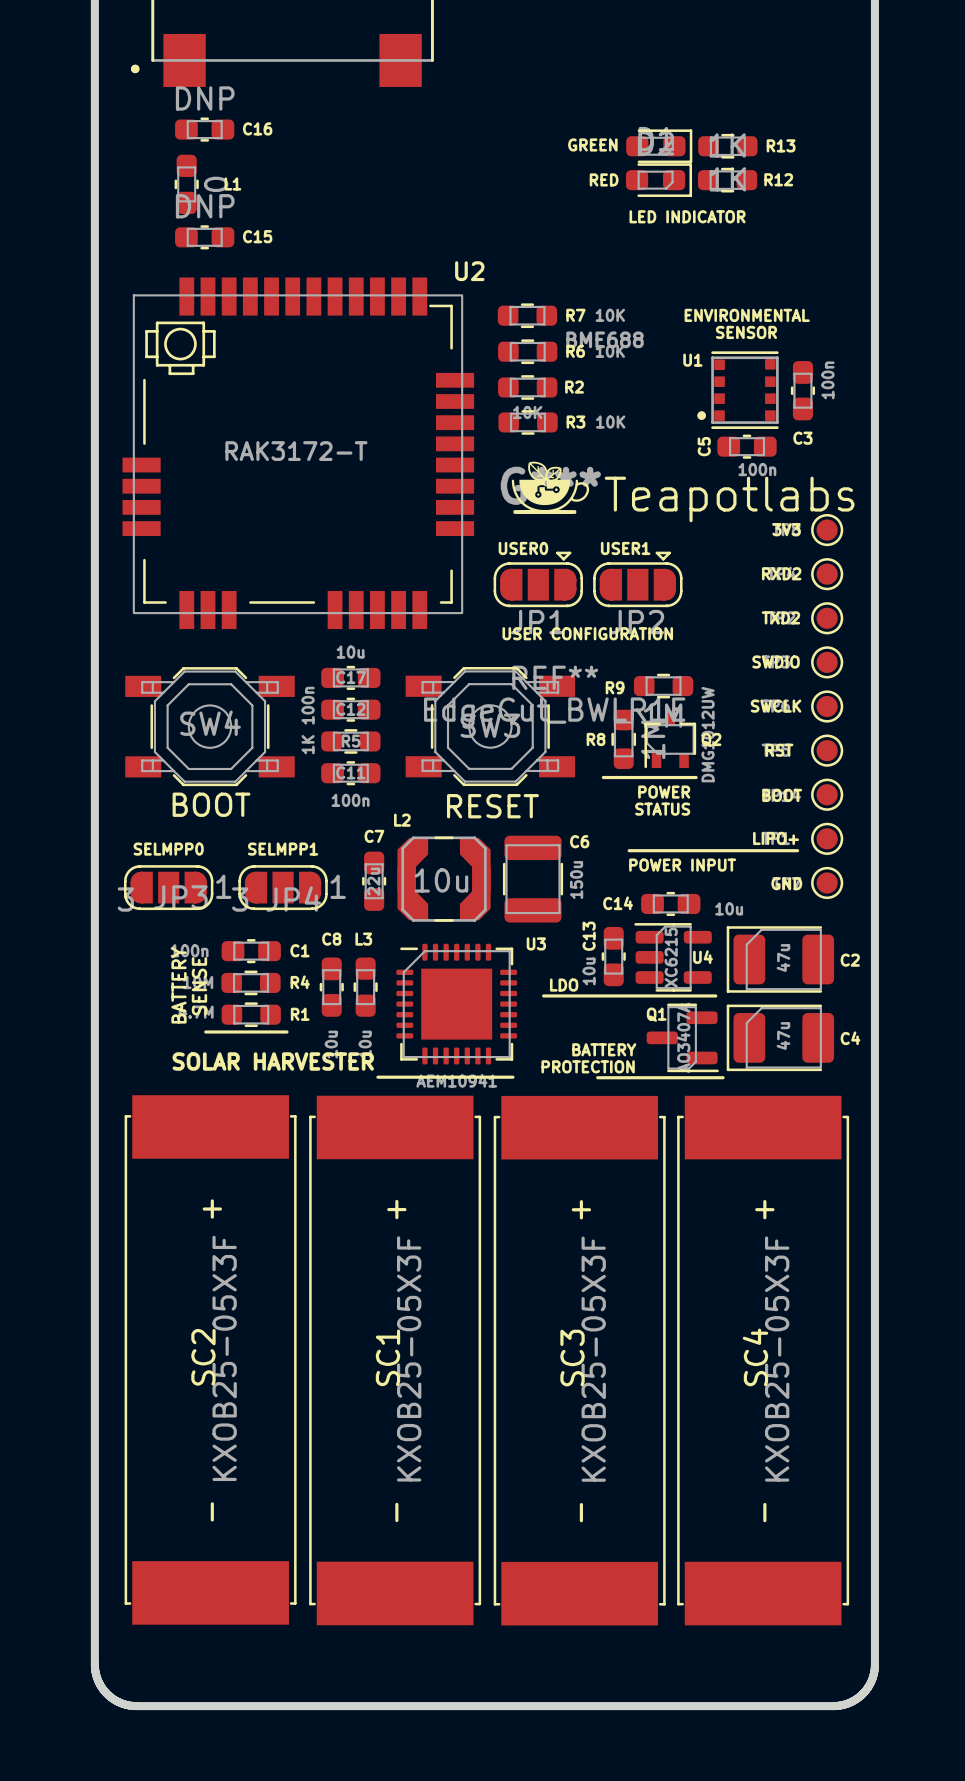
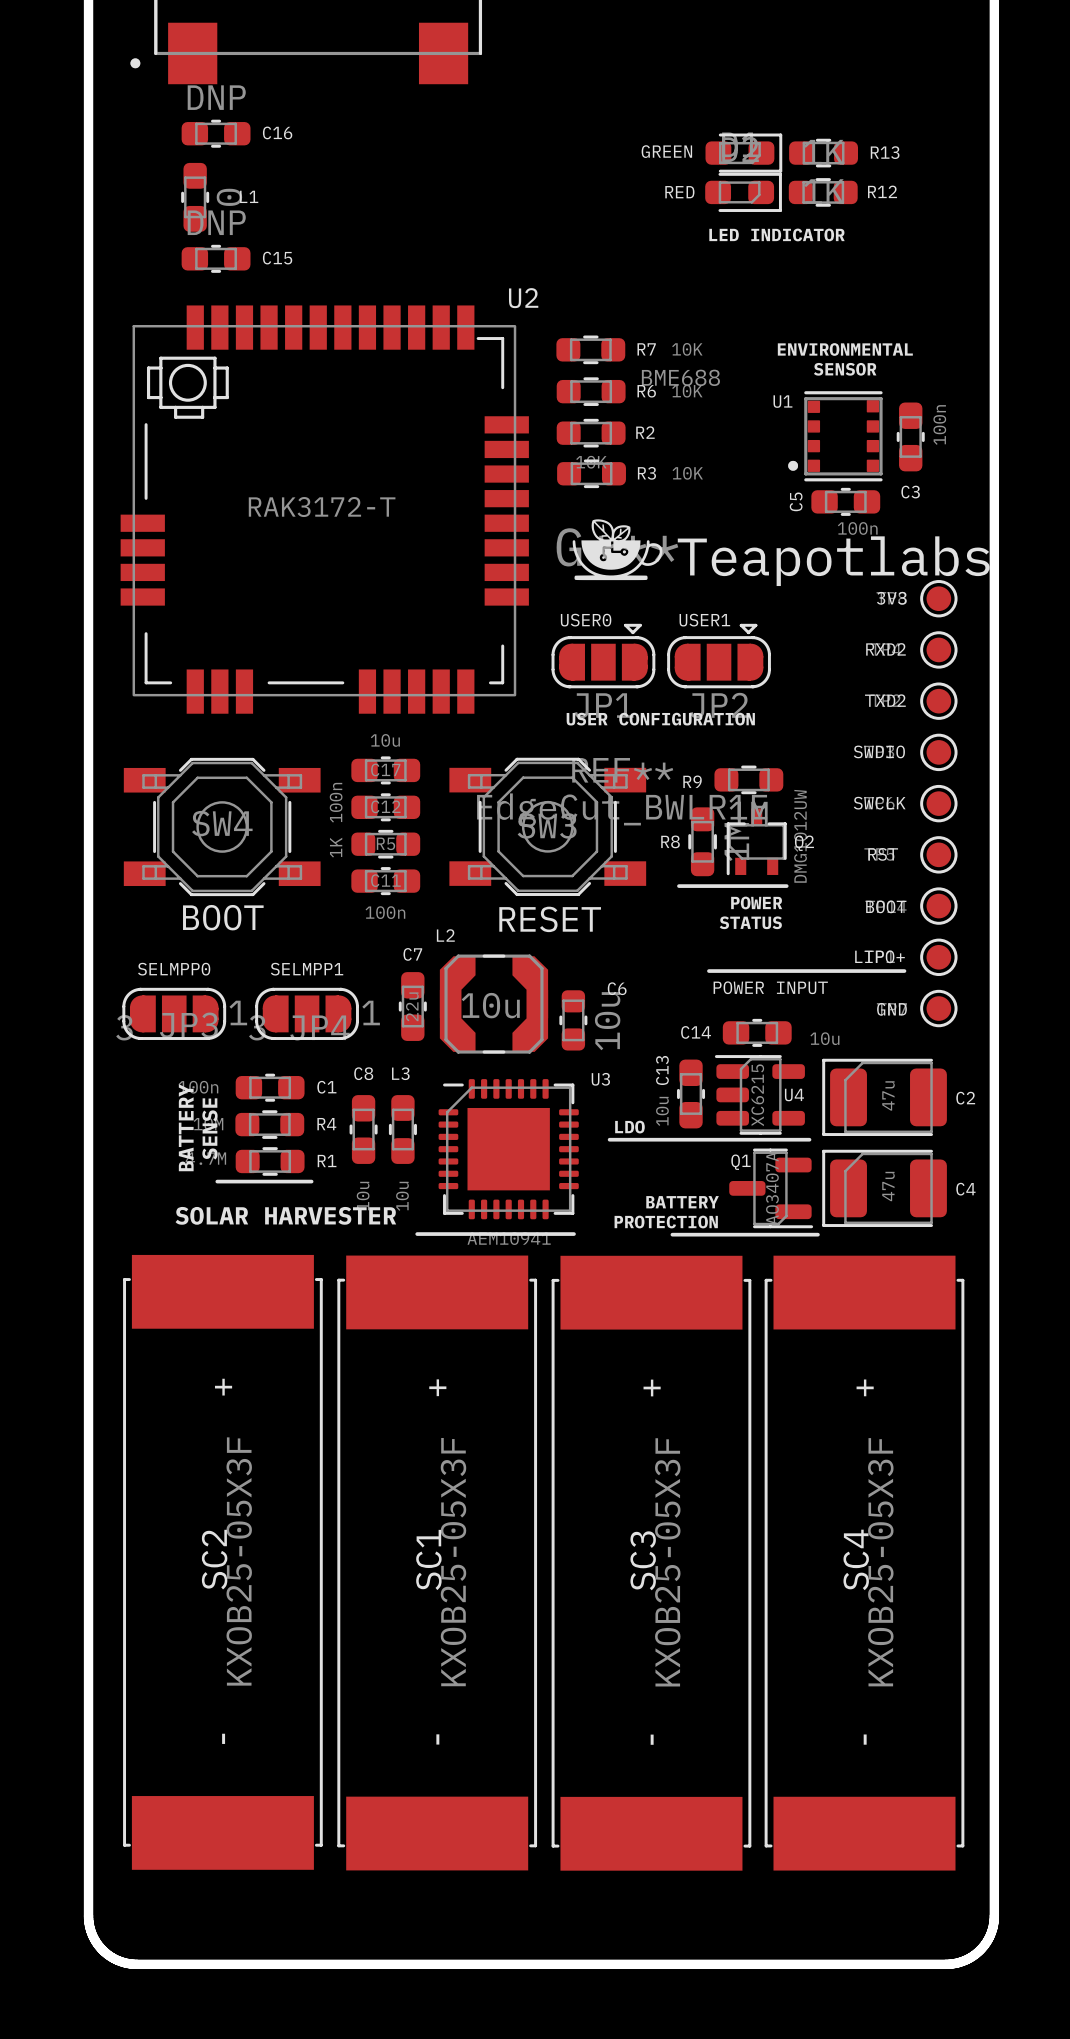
C6 footprint: [502, 835, 564, 923] -> [559, 990, 588, 1051]
C6 value: 150u (576, 879) -> 10u (607, 1021)

